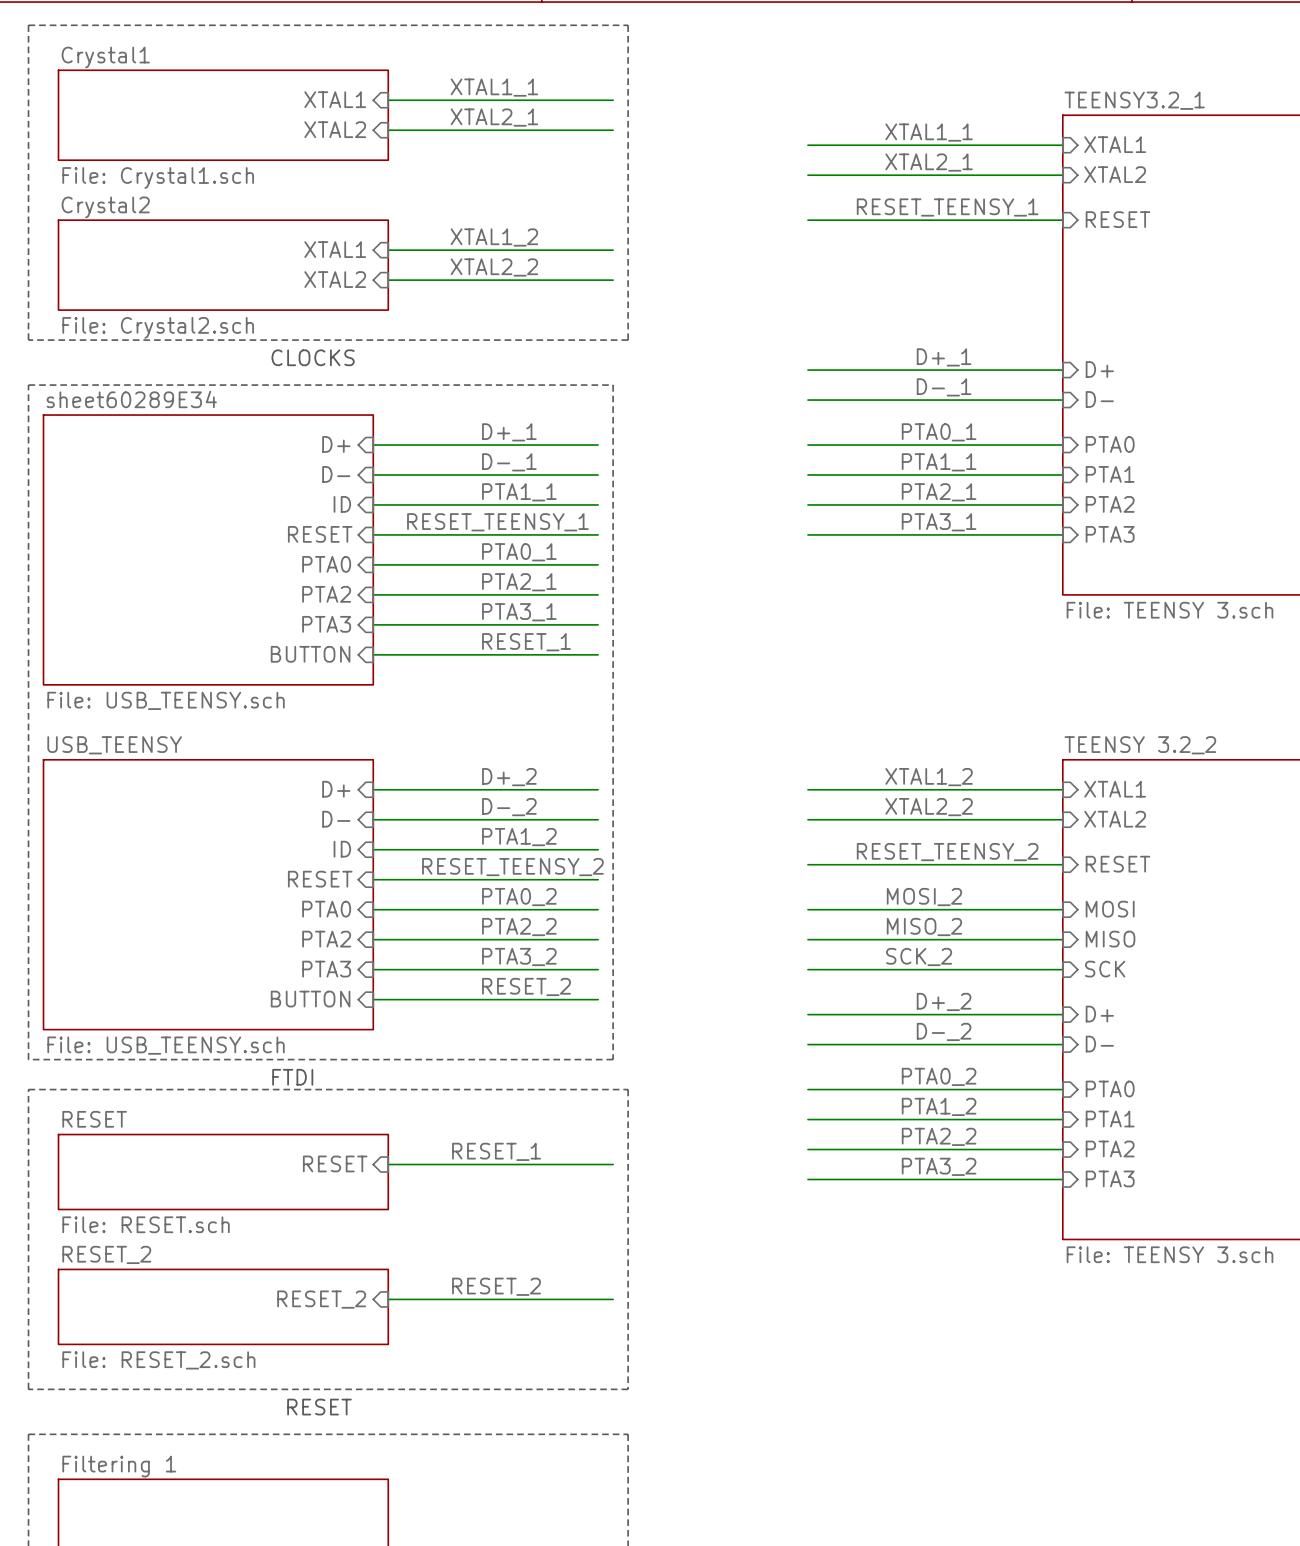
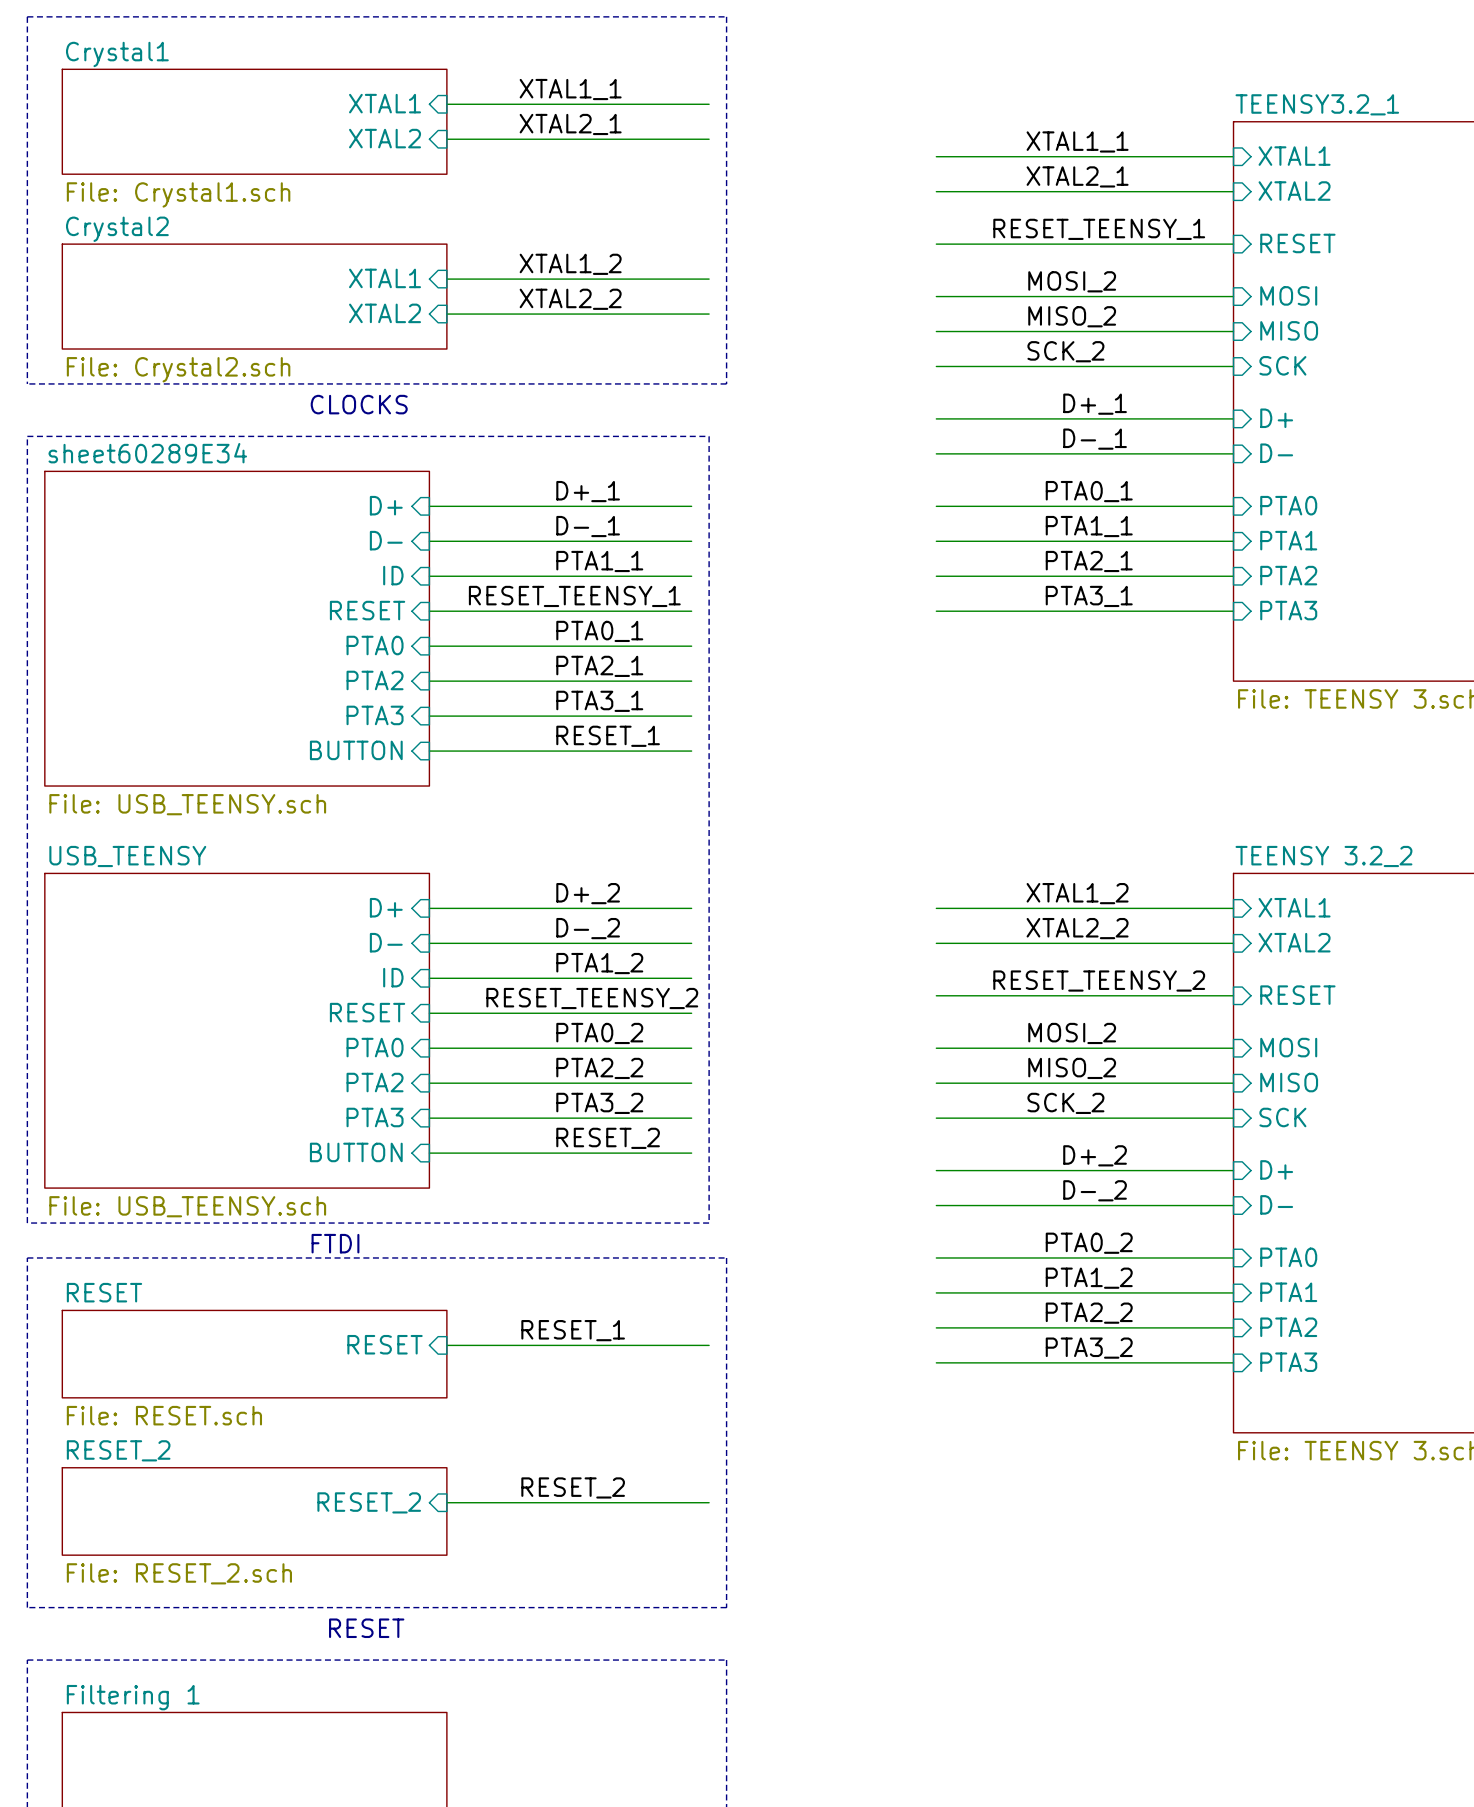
label: none -> MOSI_2 (1072, 281)
sheet pin: none -> MOSI (1288, 295)
wire: none -> (936, 296) (1233, 296)
label: none -> MISO_2 (1072, 316)
sheet pin: none -> MISO (1289, 330)
wire: none -> (936, 331) (1233, 331)
label: none -> SCK_2 (1065, 351)
sheet pin: none -> SCK (1282, 365)
wire: none -> (936, 366) (1233, 366)

